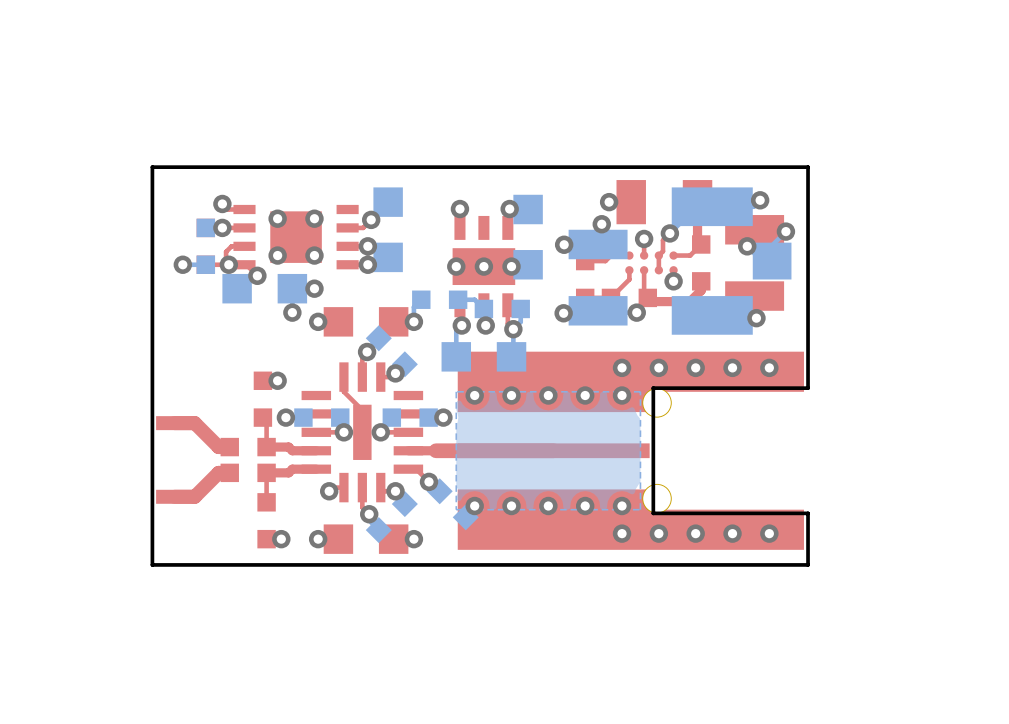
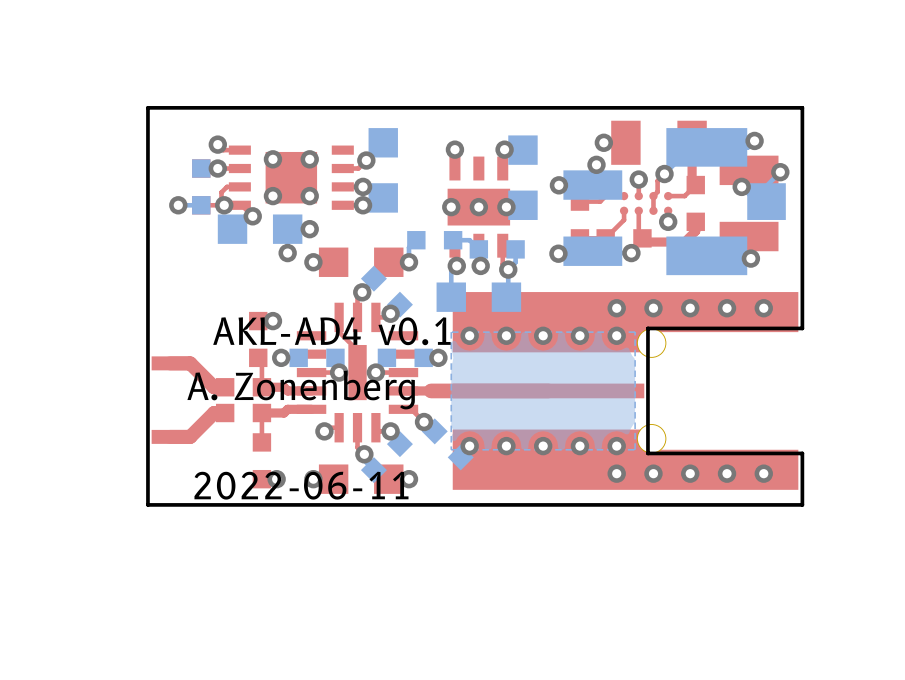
text: none -> AKL-AD4 v0.1 (331, 331)
text: none -> A. Zonenberg (301, 390)
text: none -> 2022-06-11 (301, 485)

